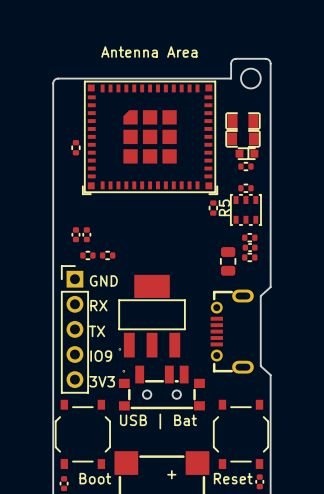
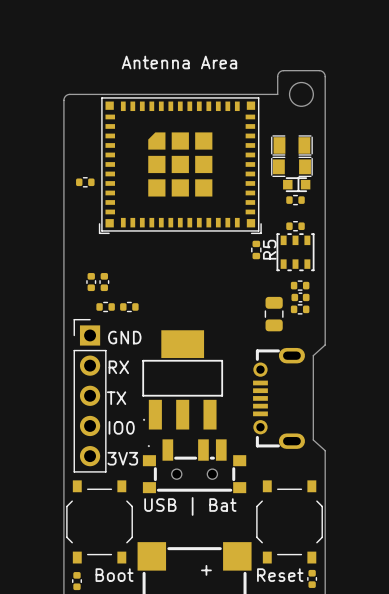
part rotation: 0° (75, 147) -> 90° clockwise (85, 182)
text: IO9 (101, 356) -> IO0 (121, 427)

